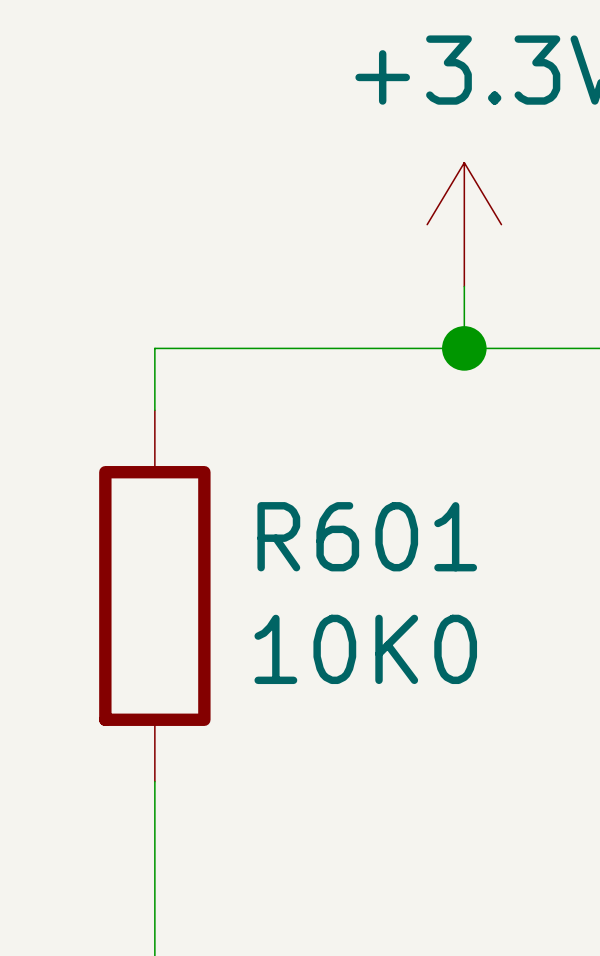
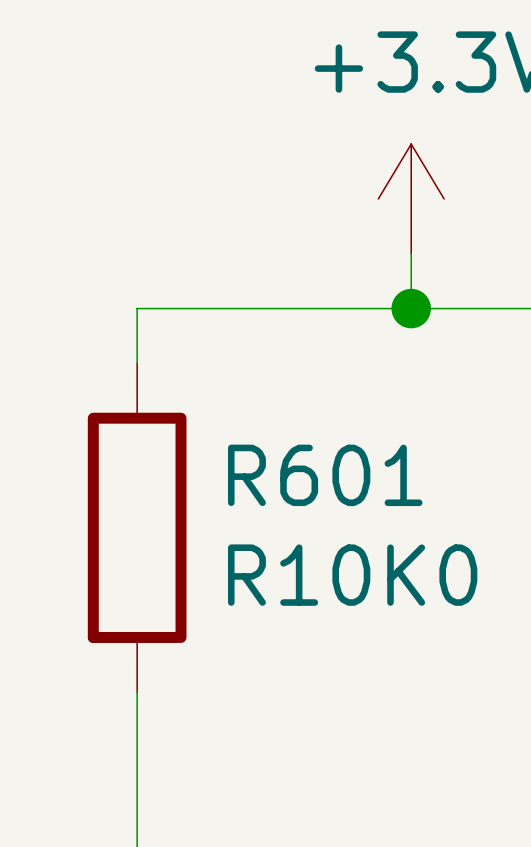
R601 value: 10K0 (365, 649) -> R10K0 (352, 575)

